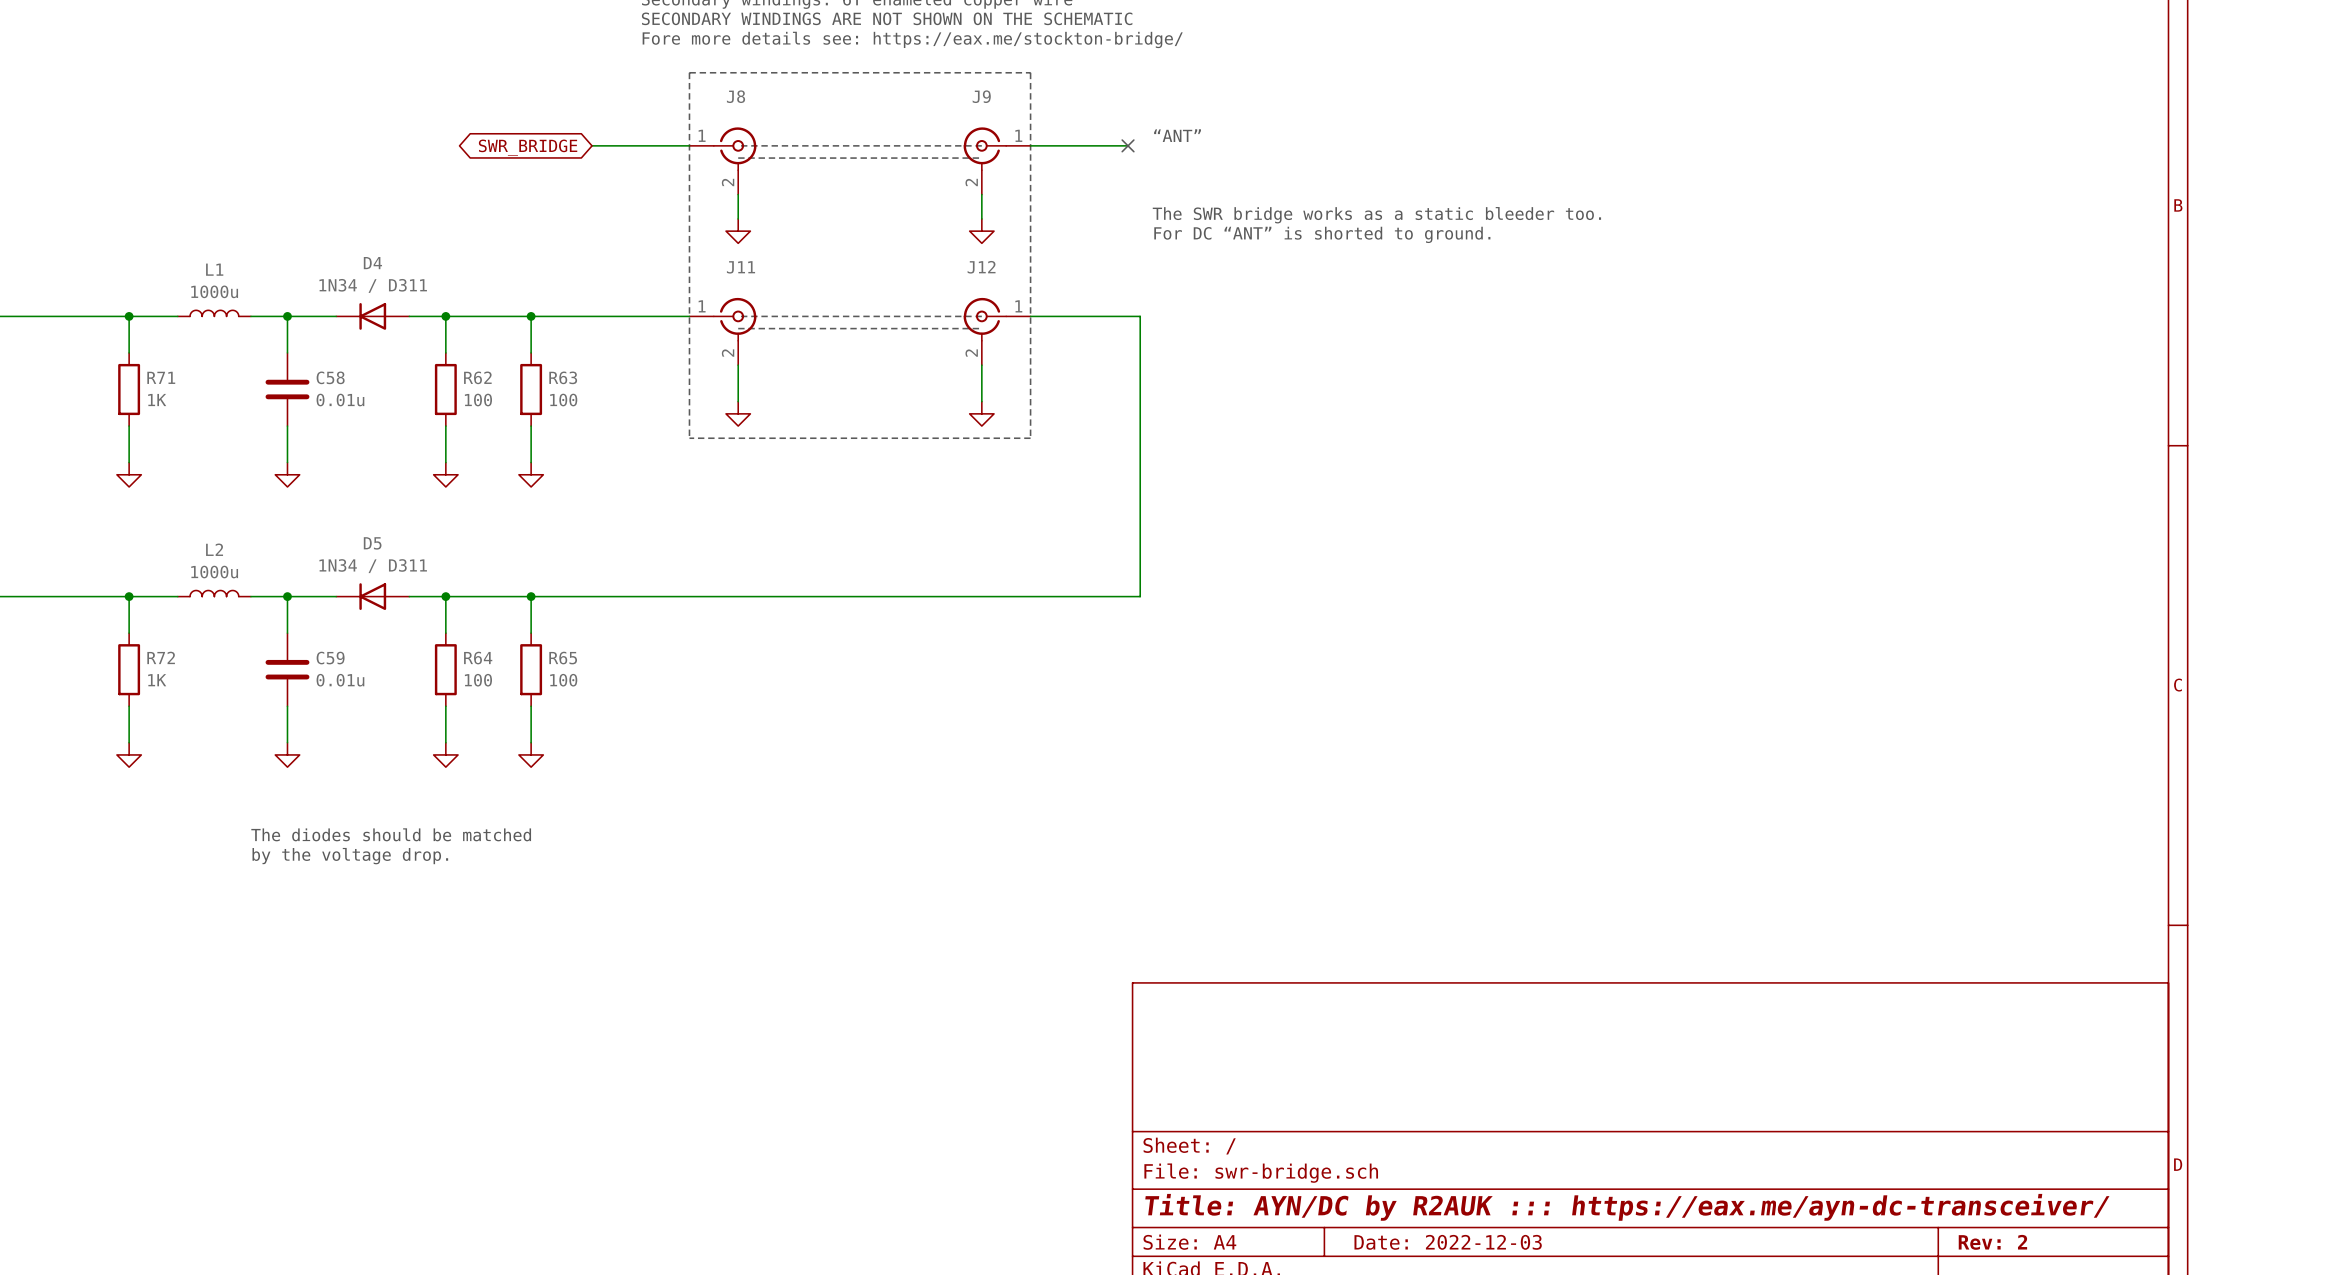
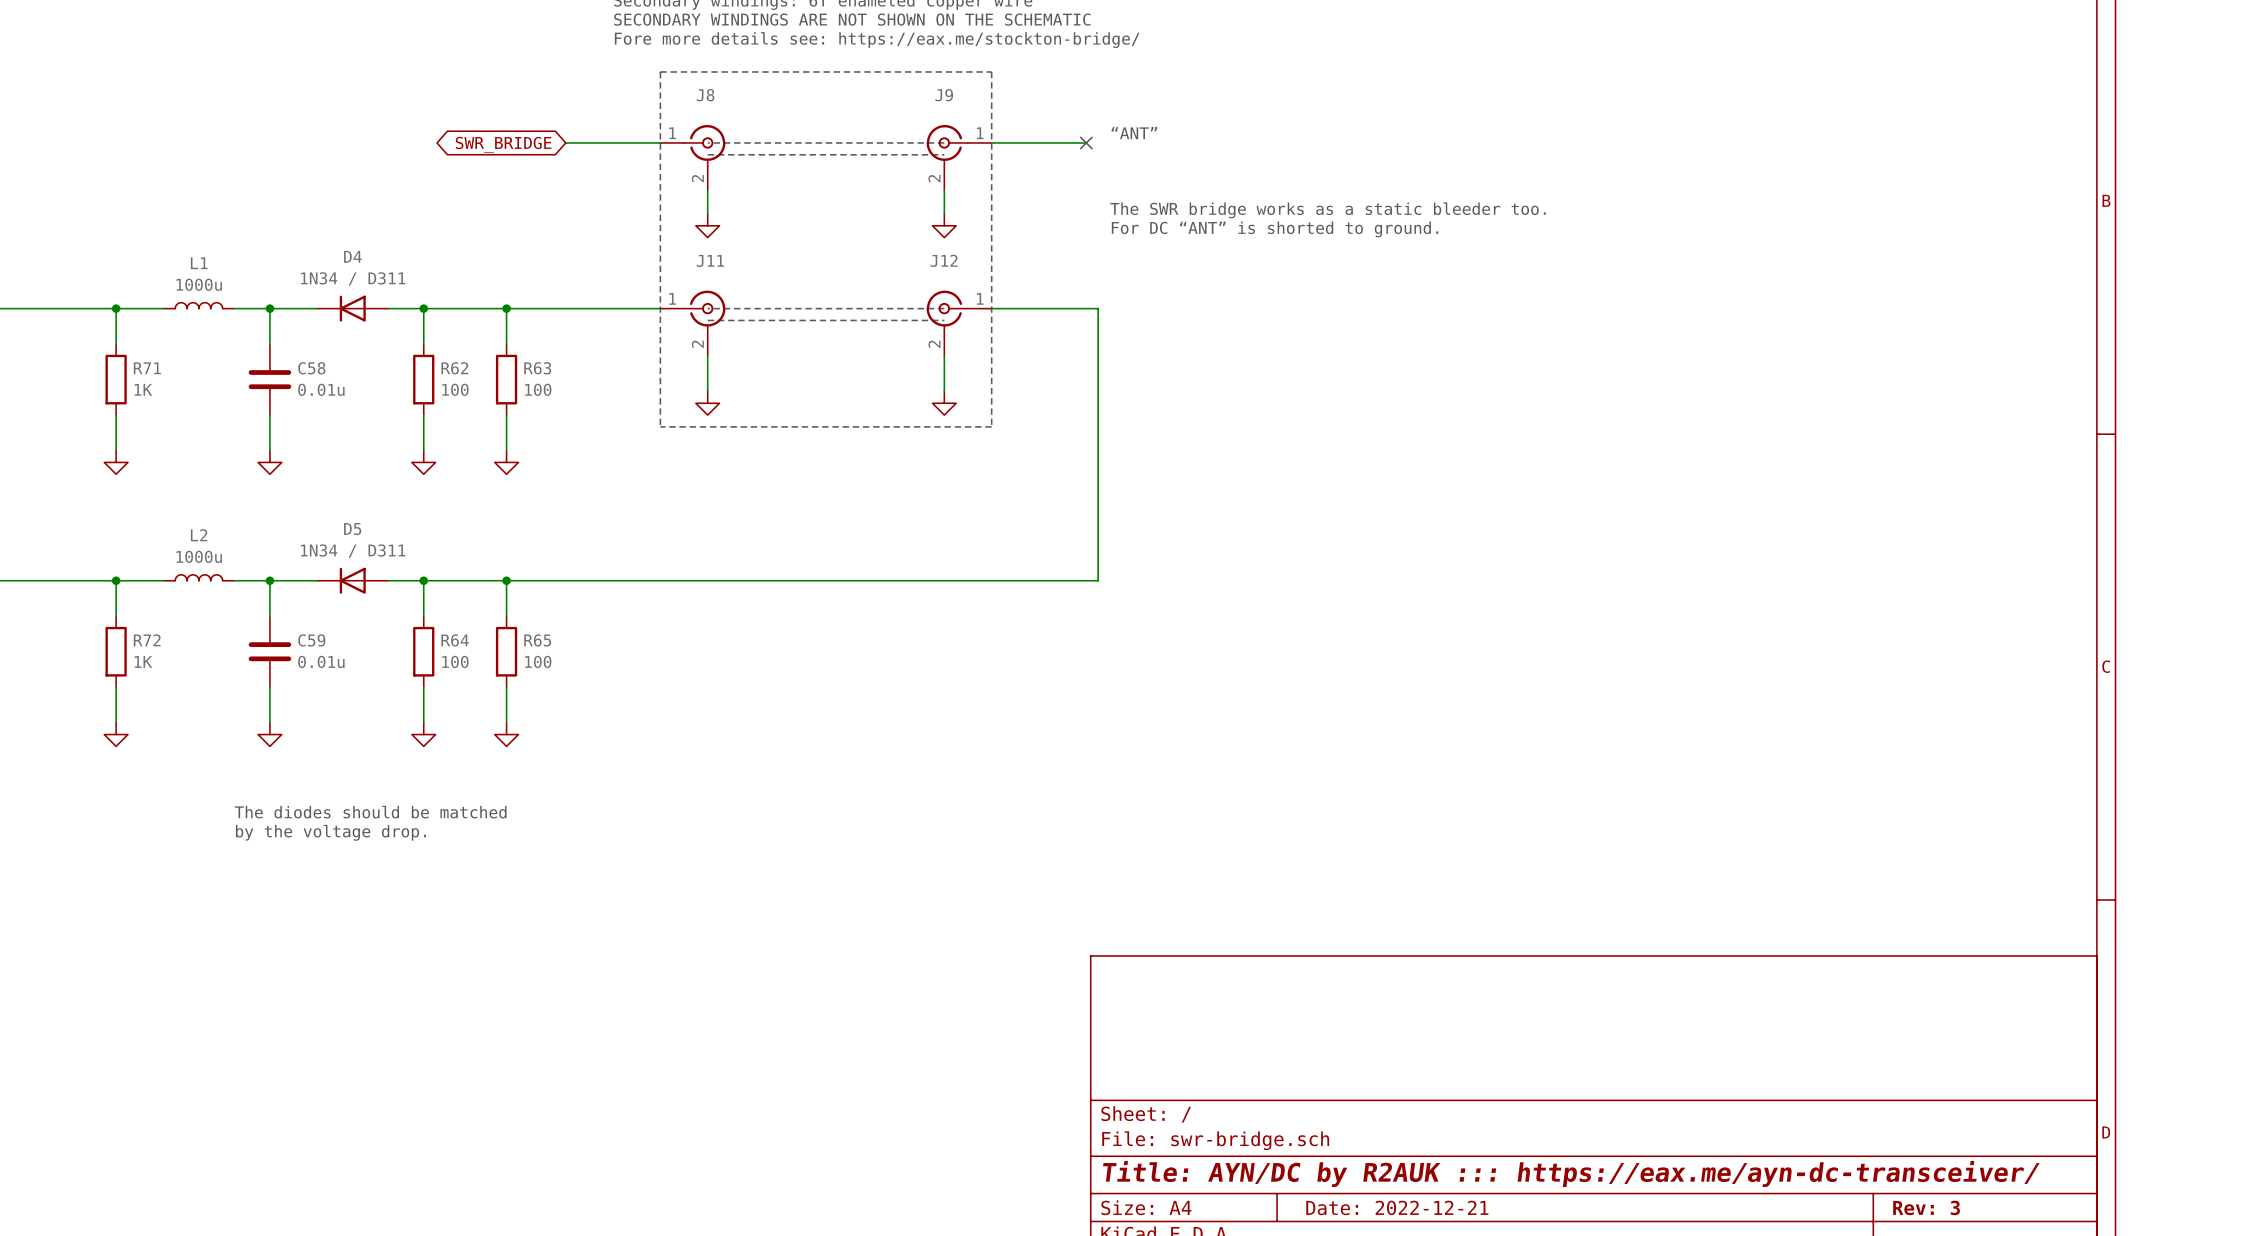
title block: Date: 2022-12-03 (1448, 1242) -> Date: 2022-12-21 (1397, 1207)
title block: Rev: 2 (1992, 1242) -> Rev: 3 (1926, 1207)

